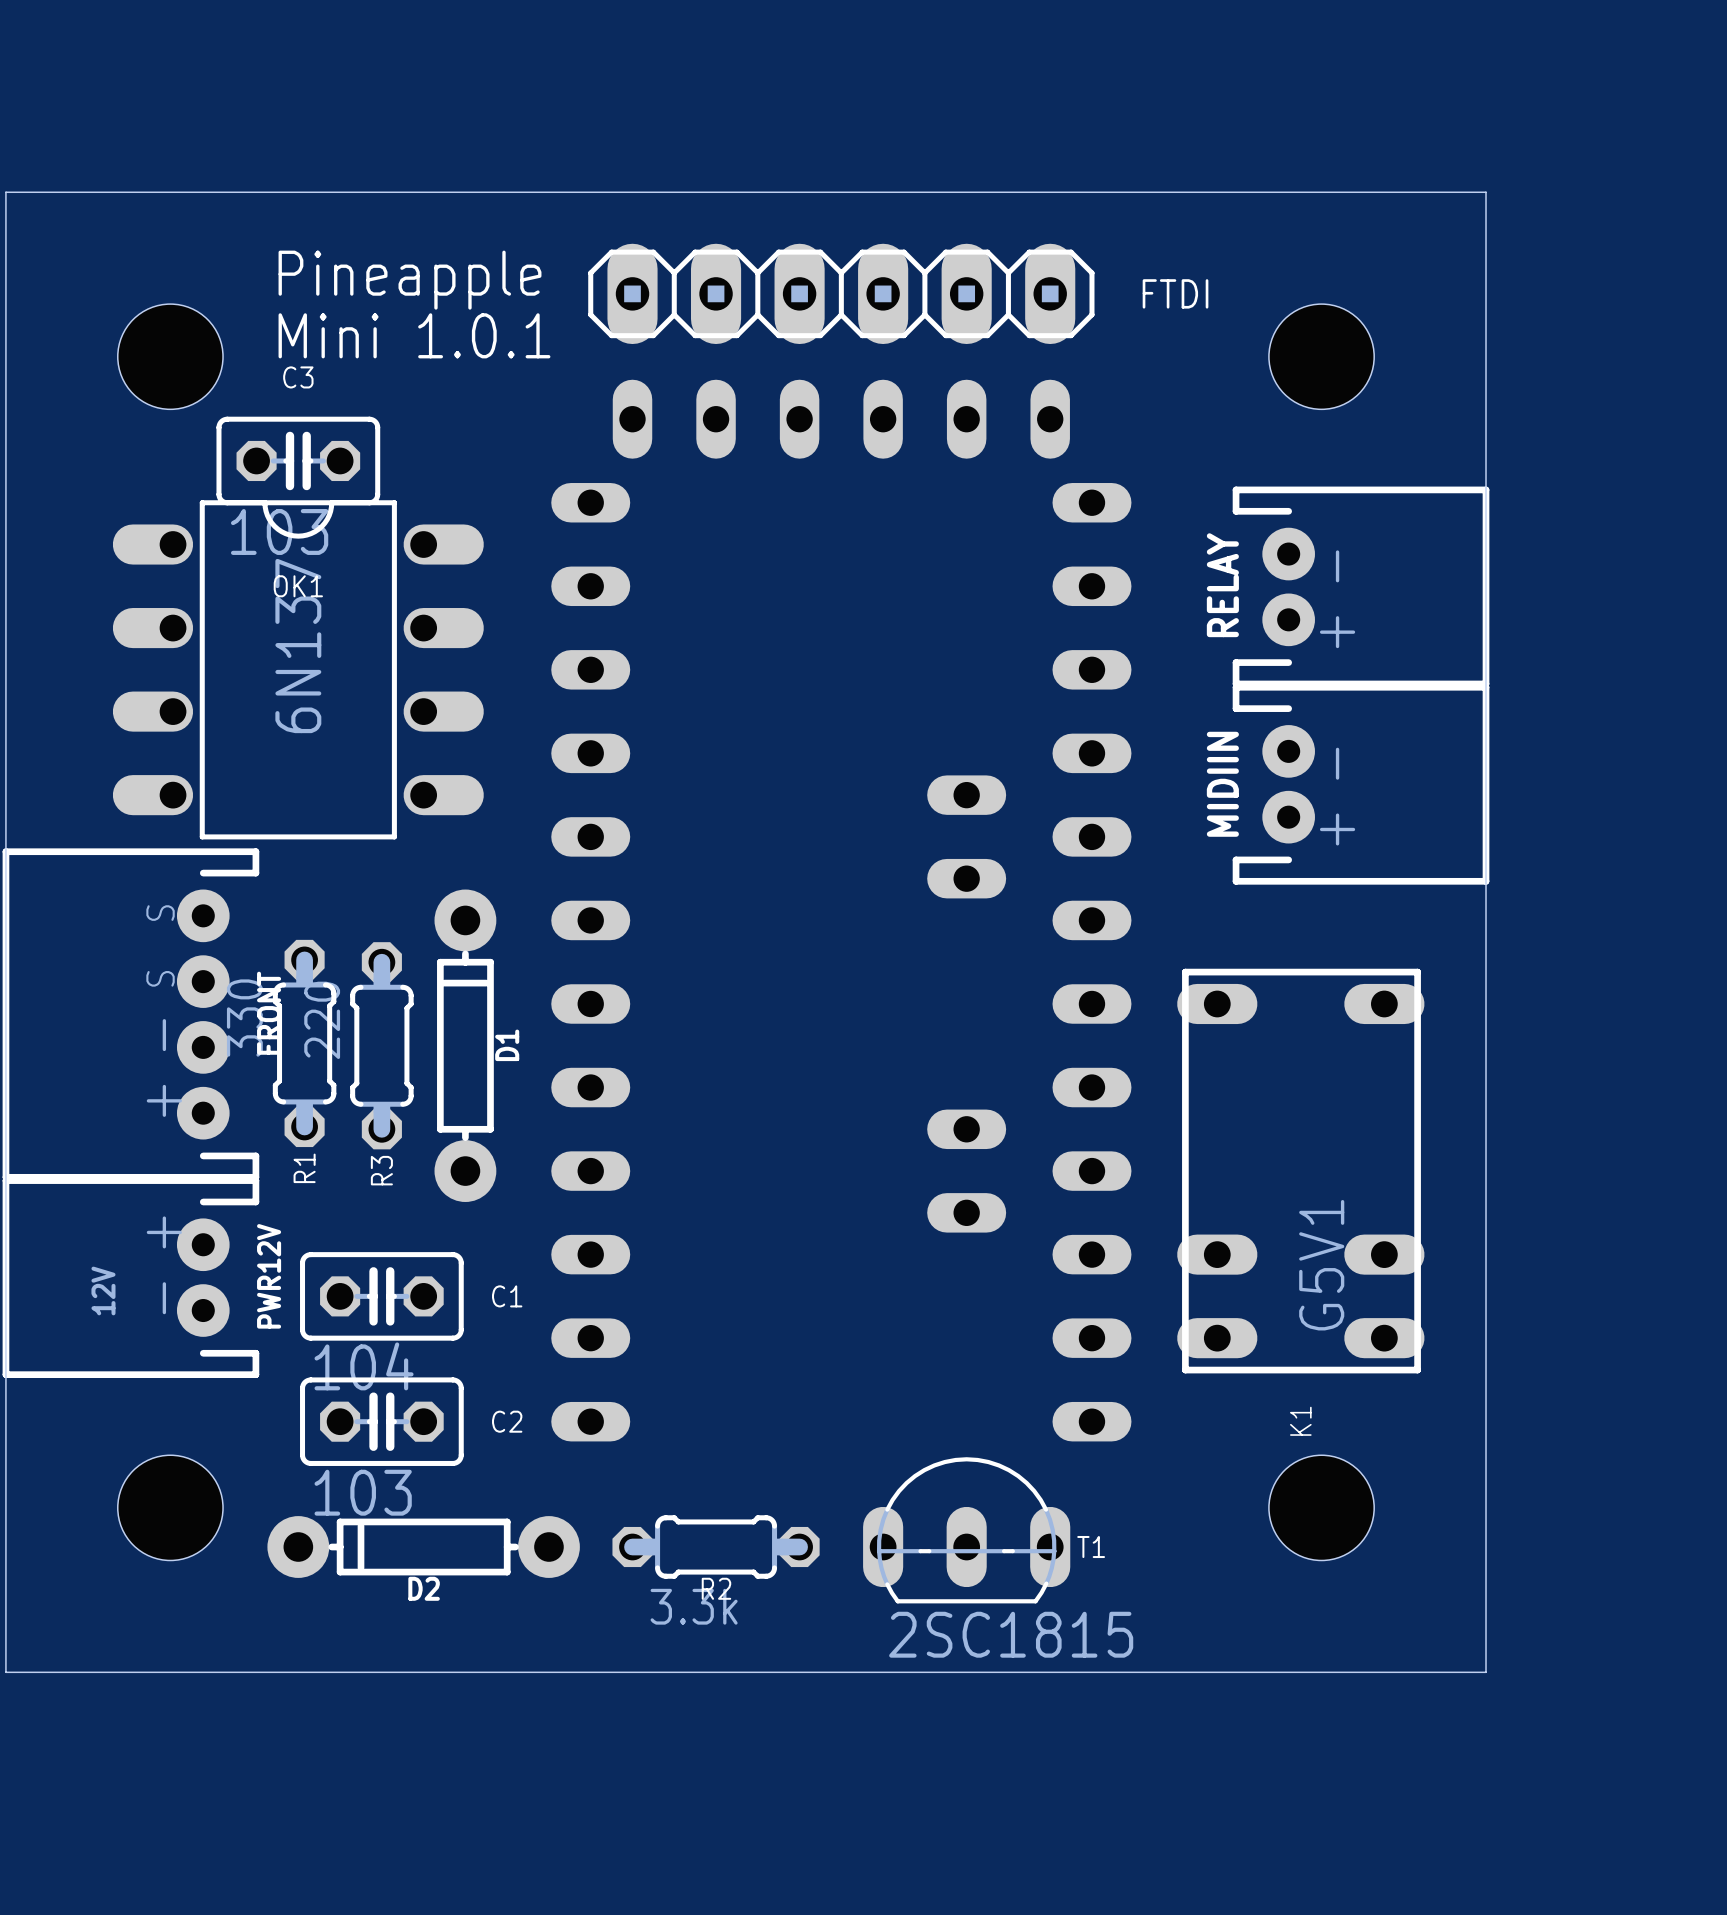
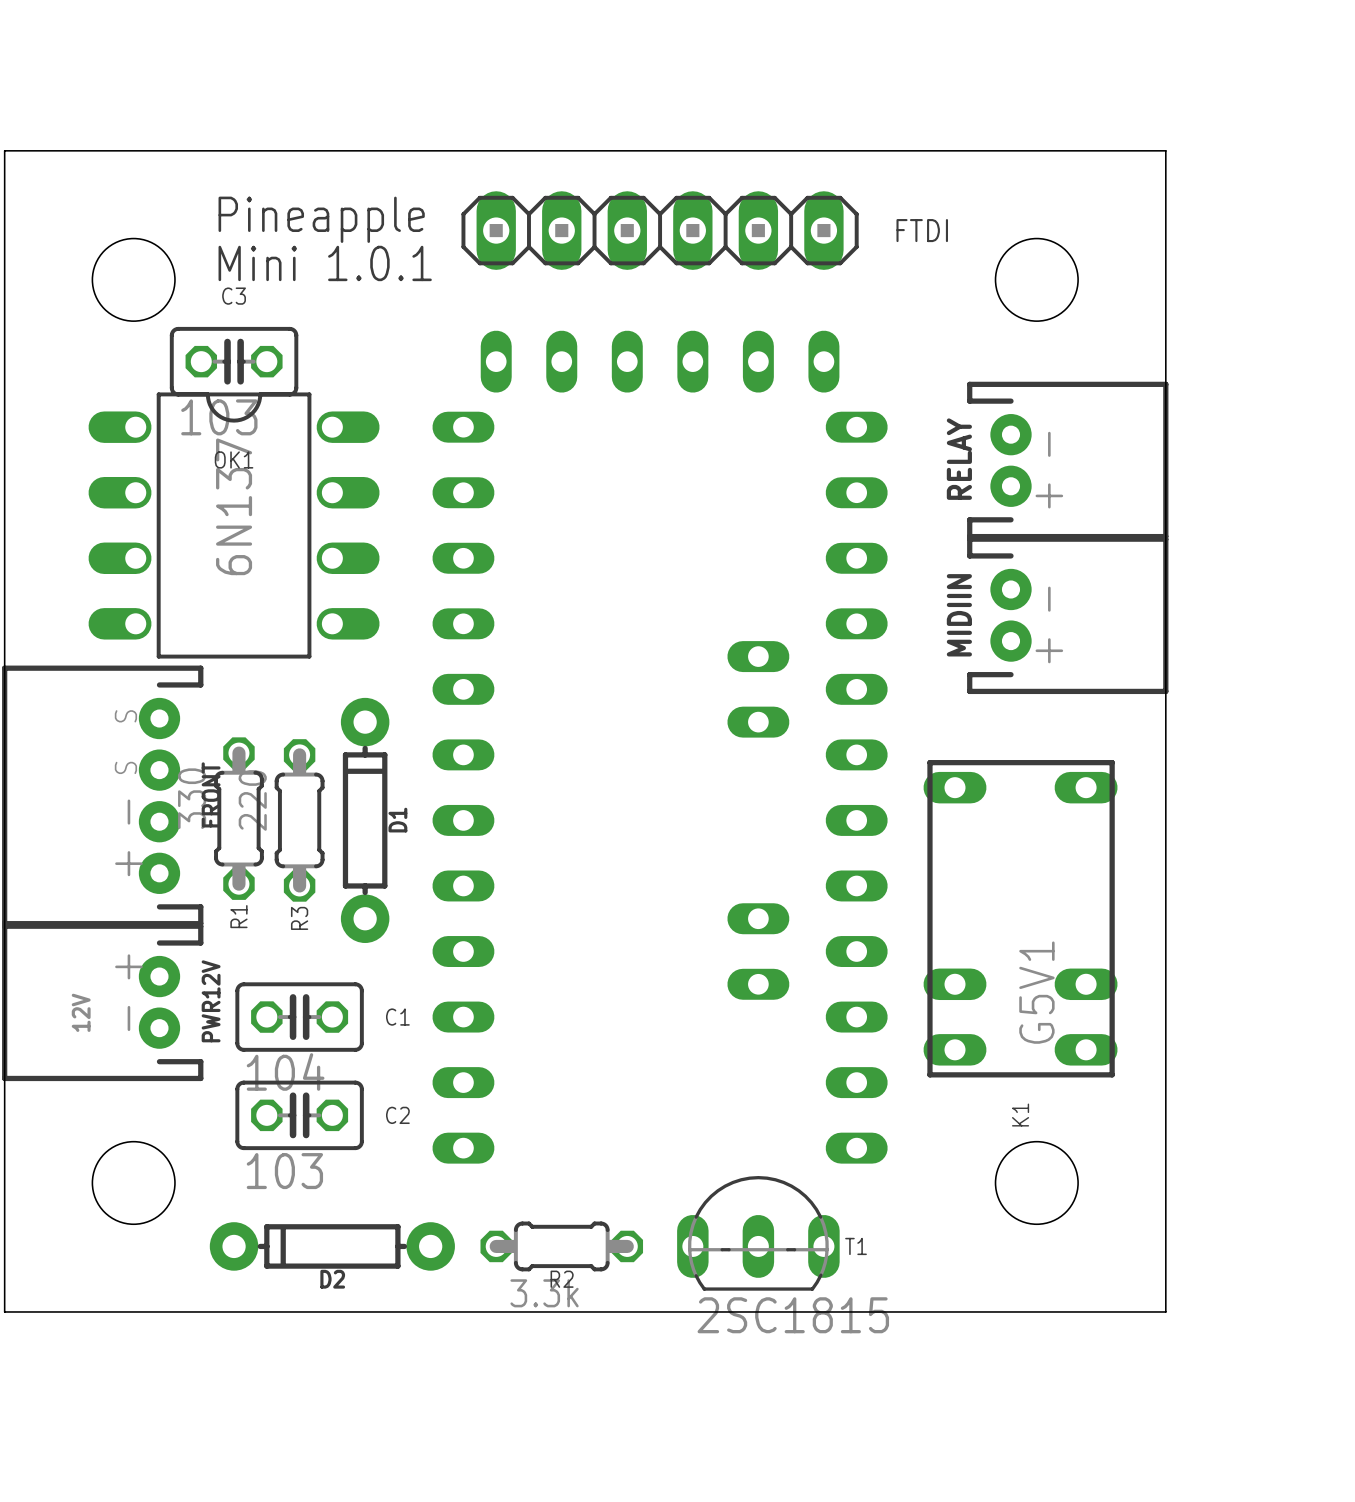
part position: (841, 910) -> (660, 747)
T1 position: (966, 1530) -> (758, 1233)
D2 position: (423, 1547) -> (332, 1246)
R2 position: (716, 1547) -> (561, 1246)

